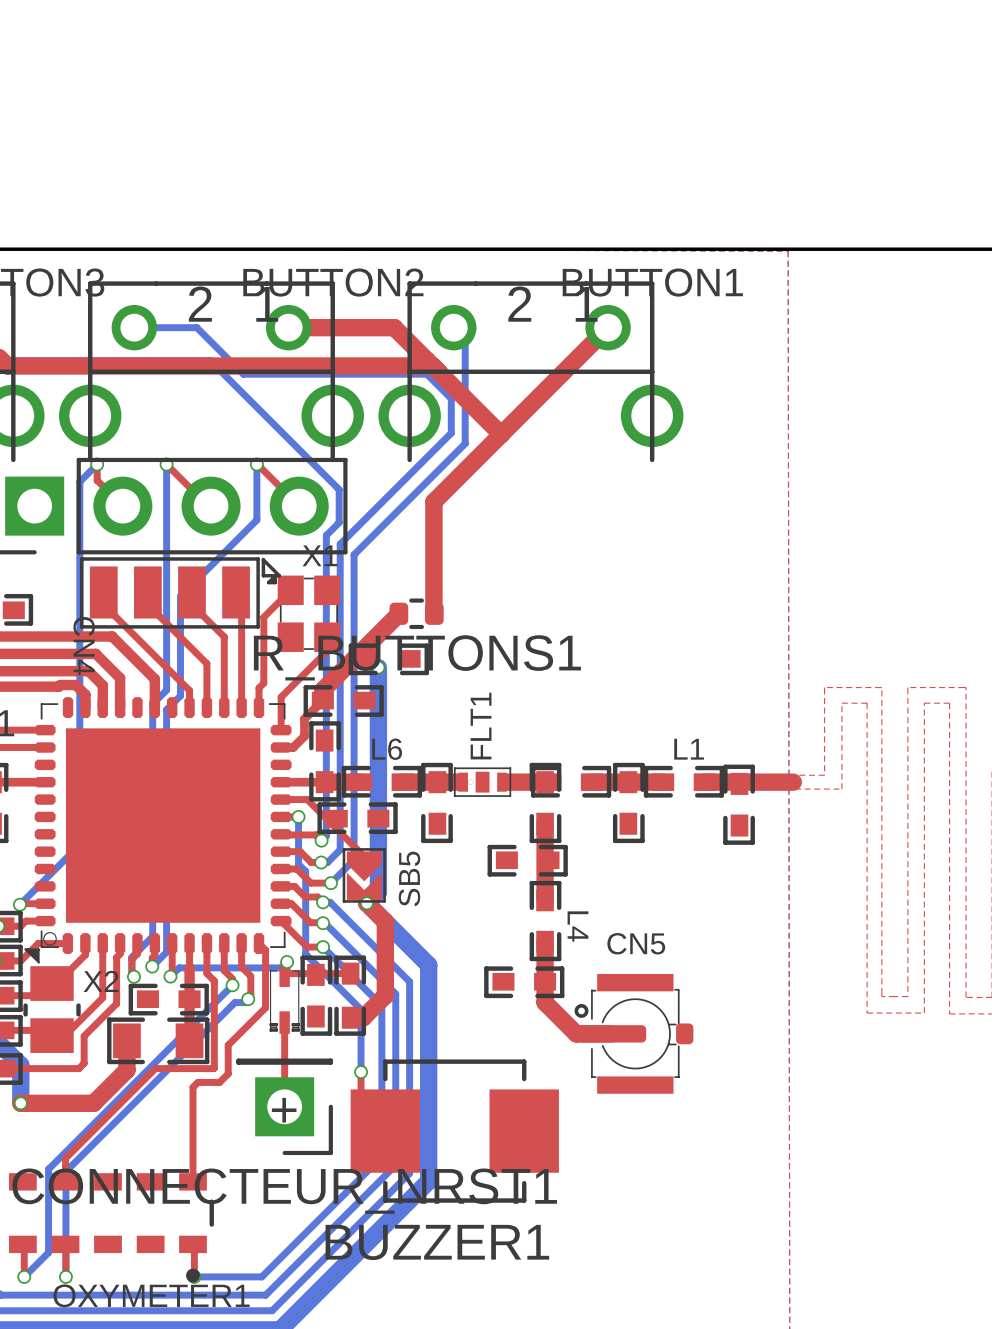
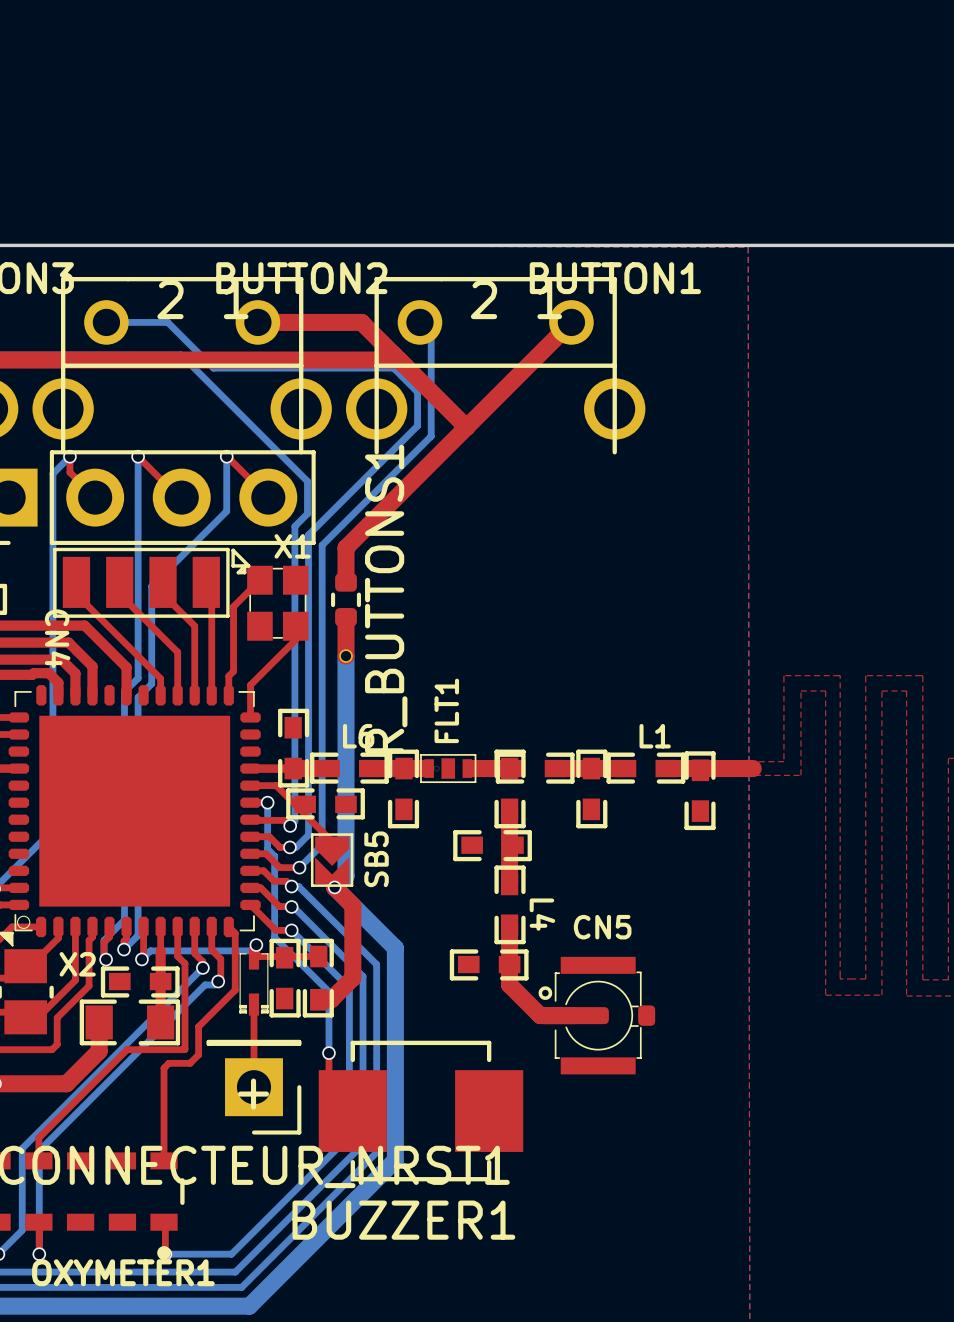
top track: (433, 501) (433, 613) -> (400, 493) (346, 547) (346, 582)
top track: (399, 613) (322, 690) (322, 700) (304, 718) (304, 736) (293, 747) (281, 747) -> none
R_BUTTONS1 rotation: 0° (416, 613) -> 90° clockwise (346, 599)
R_BUTTONS1 position: (416, 613) -> (346, 599)
top track: none -> (346, 617) (346, 656)
part: (388, 659) -> none
part: (343, 701) -> none

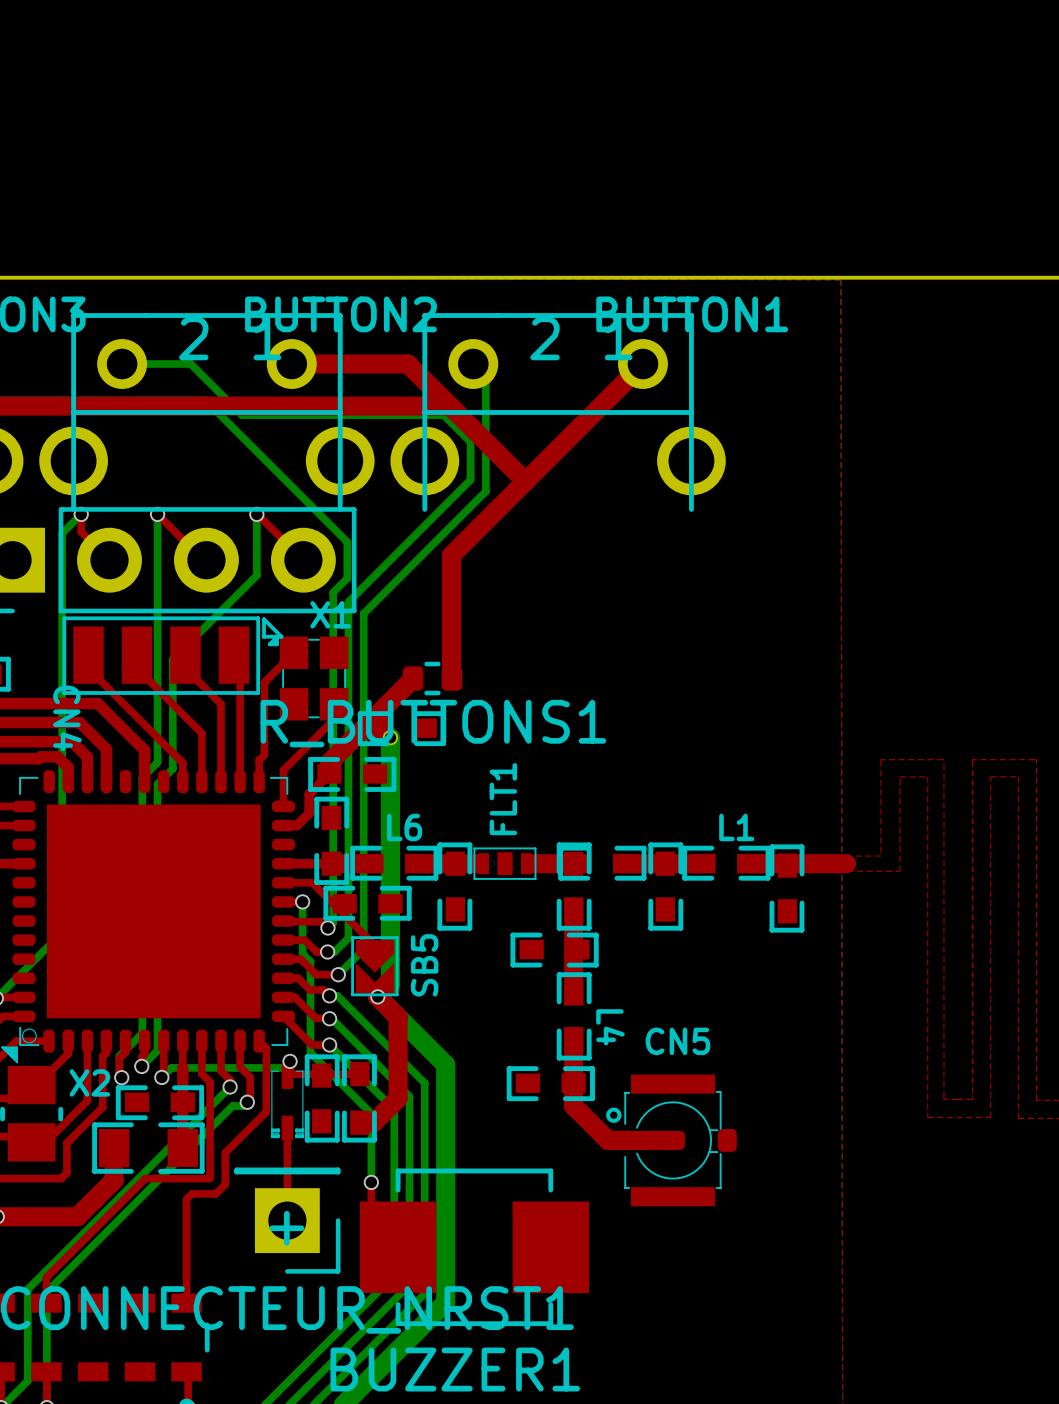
top track: (400, 493) (346, 547) (346, 582) -> (451, 555) (451, 678)
R_BUTTONS1 rotation: 0° (346, 599) -> 90° clockwise (432, 678)
R_BUTTONS1 position: (346, 599) -> (432, 678)
top track: none -> (413, 678) (329, 762) (329, 773) (309, 794) (309, 813) (296, 825) (283, 825)
top track: (346, 617) (346, 656) -> none
part: none -> (401, 728)
part: none -> (352, 774)

